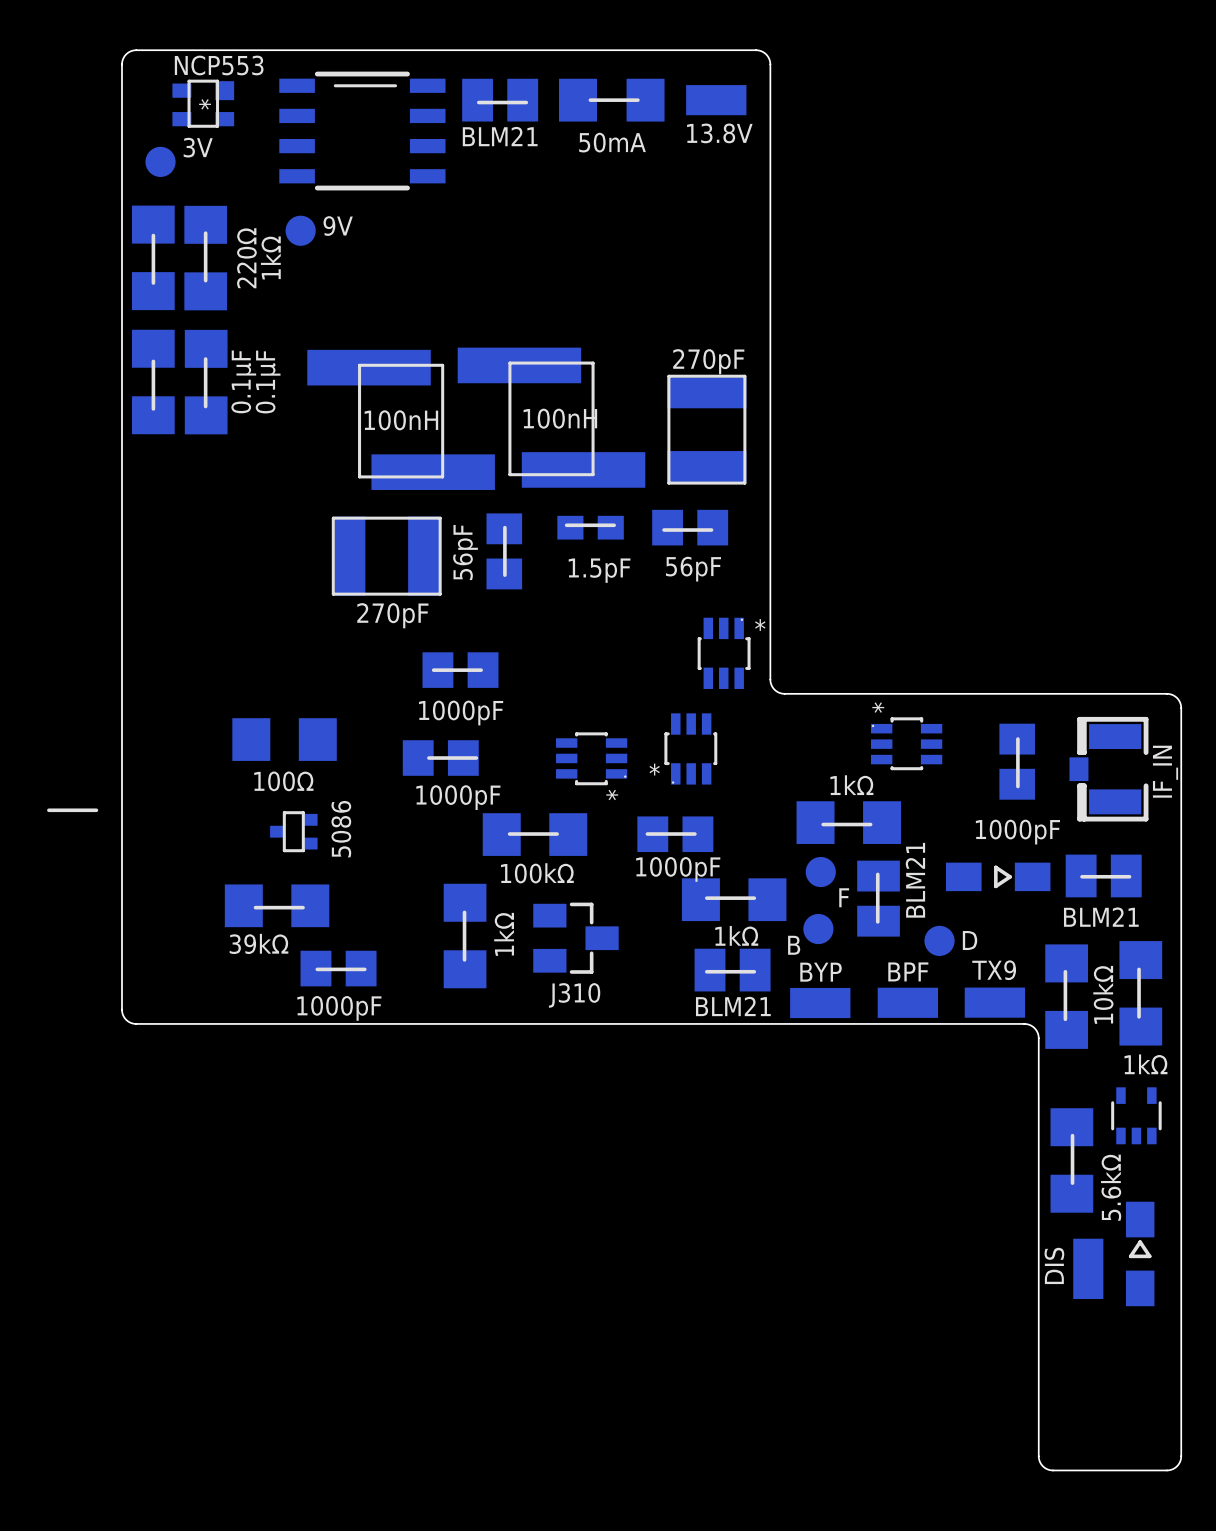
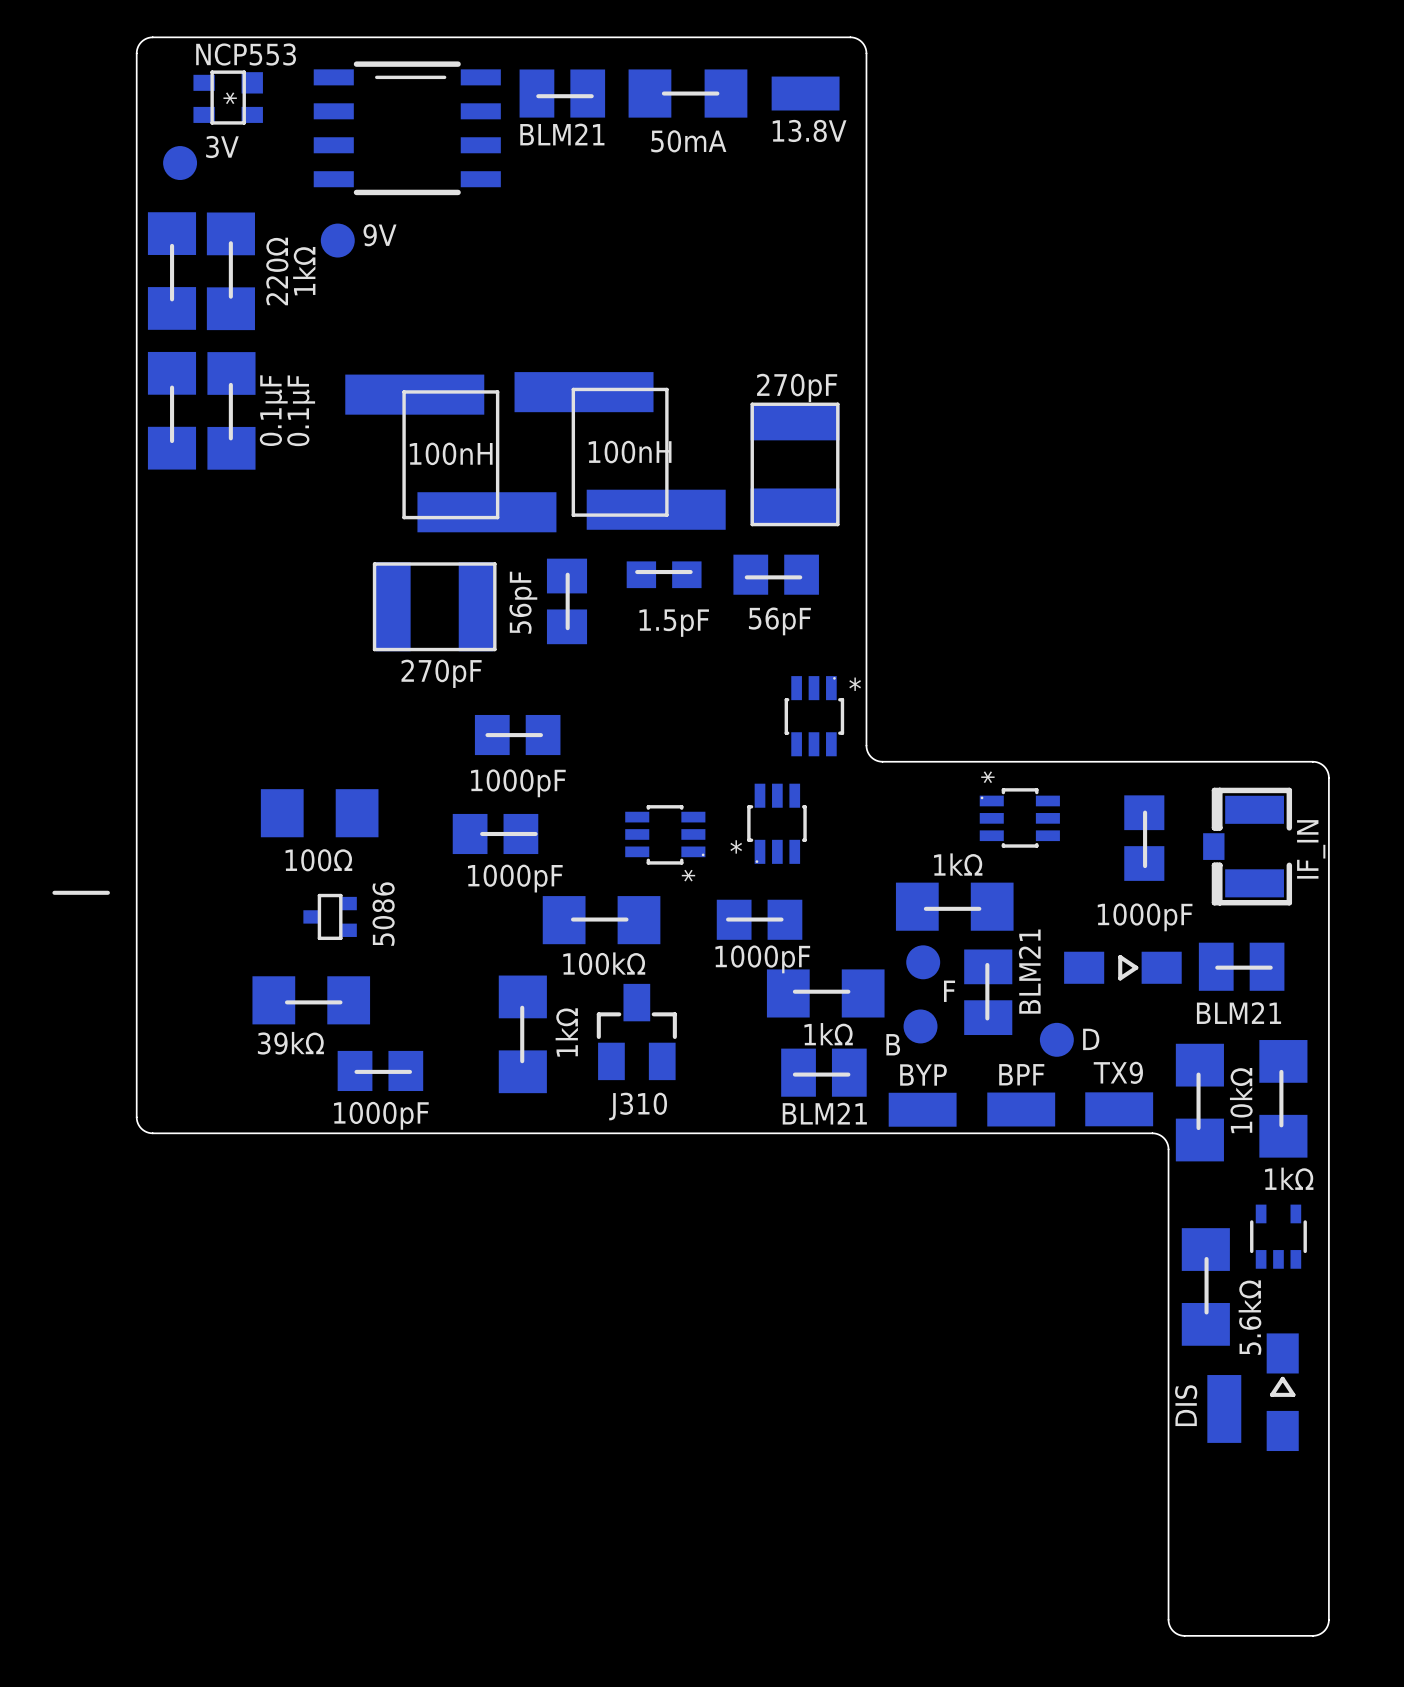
part rotation: 0° (575, 938) -> 90° counterclockwise (636, 1032)

